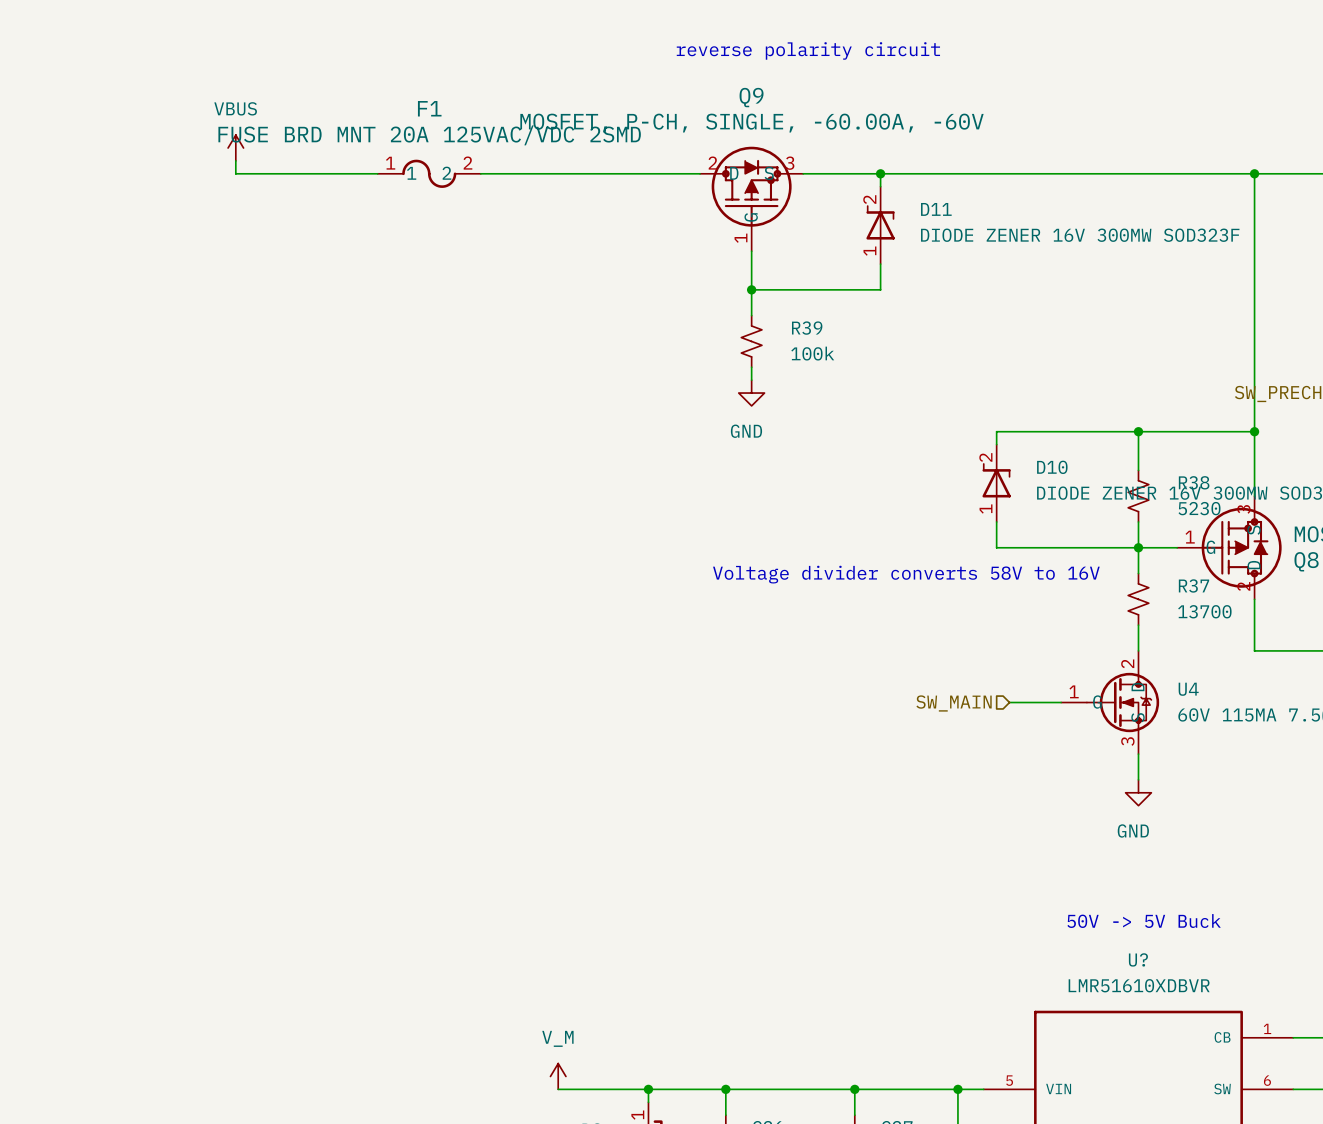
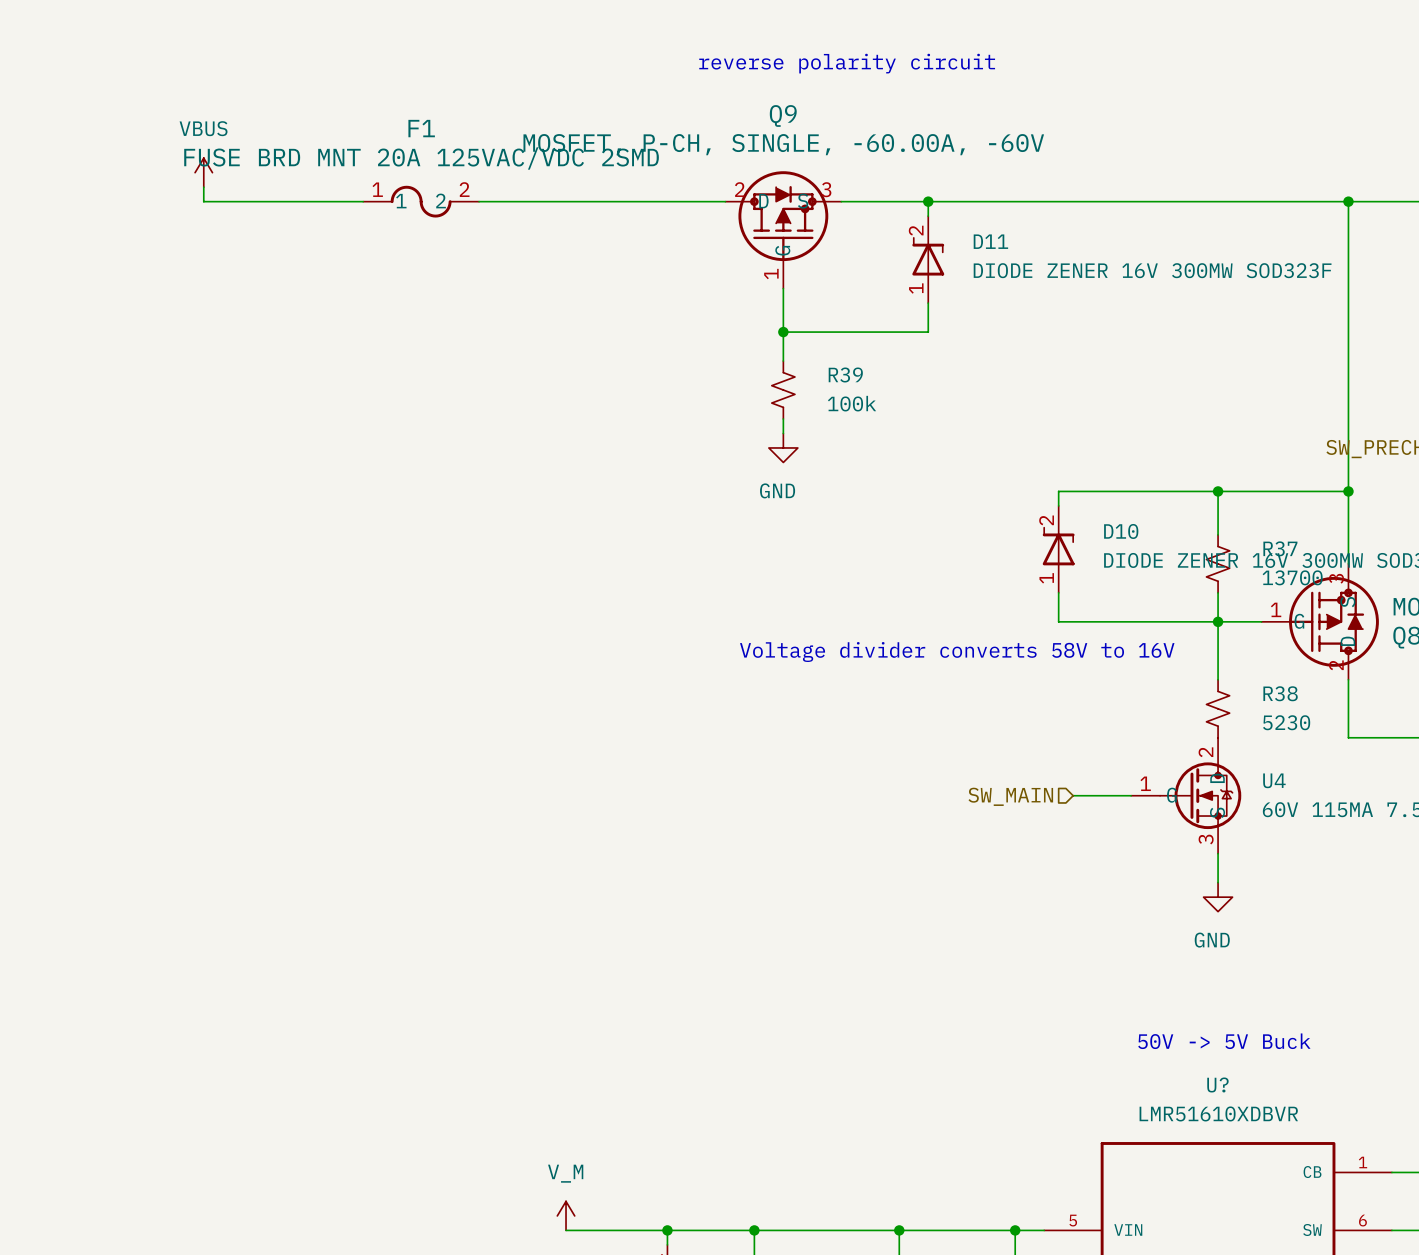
R38 name: R38 (1194, 482) -> R37 (1280, 548)
R38 value: 5230 (1199, 508) -> 13700 (1292, 577)
R37: 13700 (1138, 599) -> none
R38: none -> 5230 (1218, 708)

